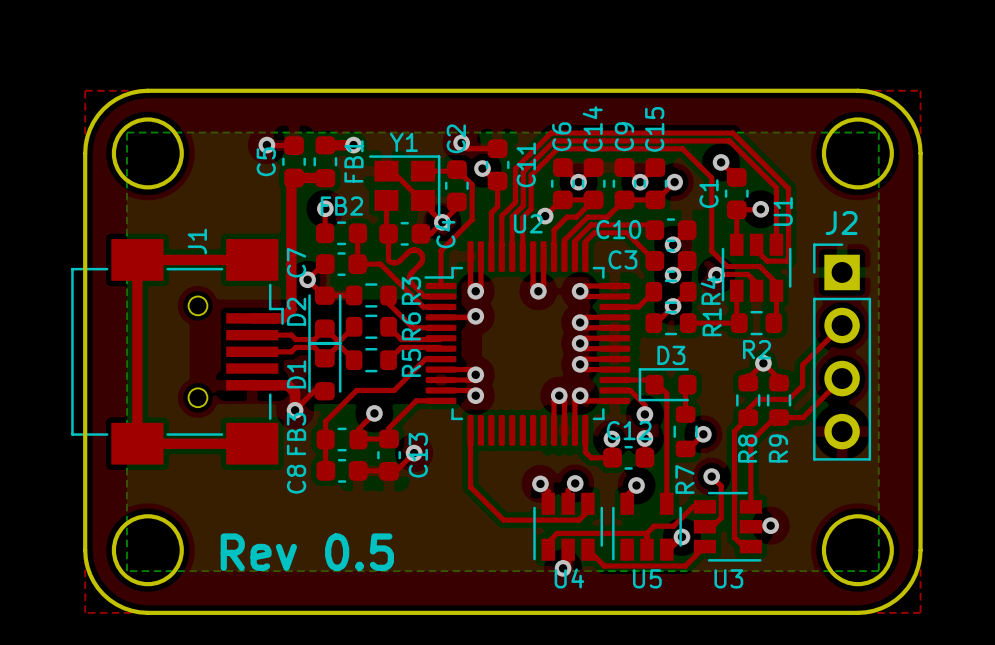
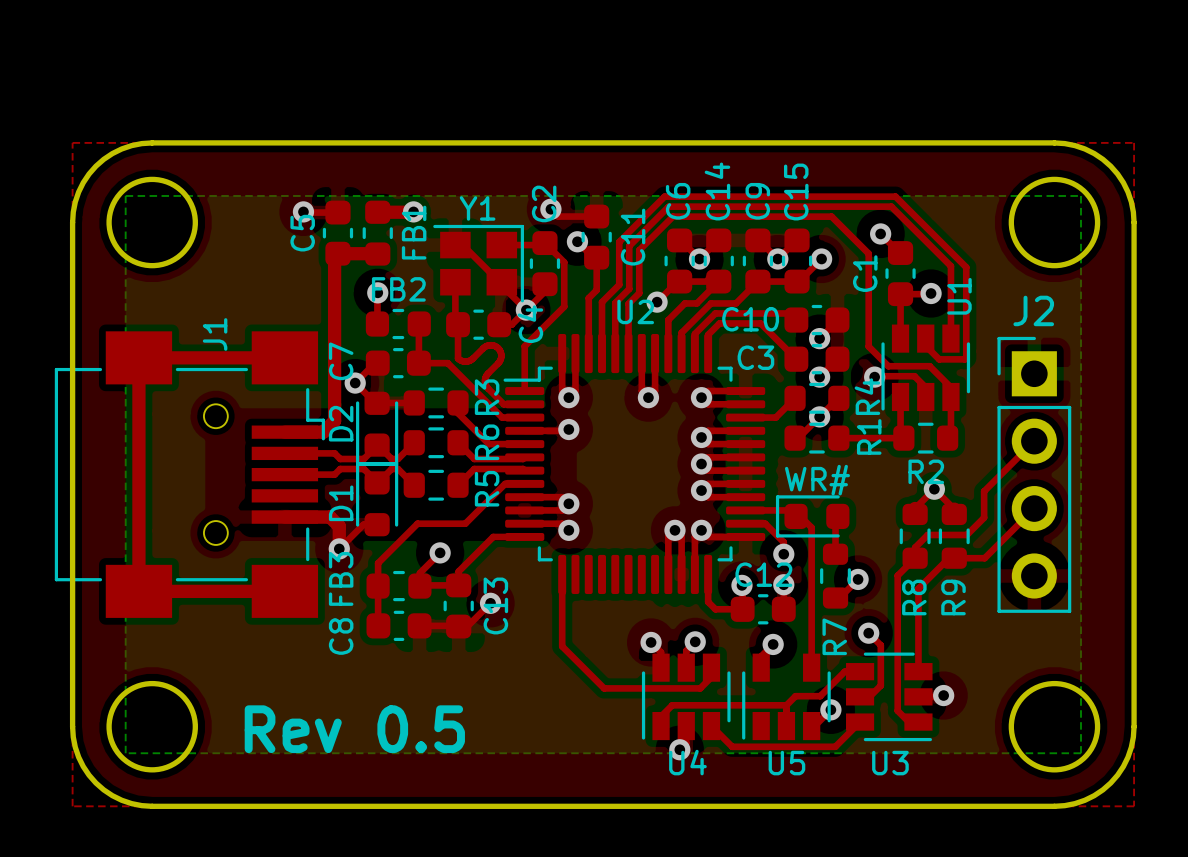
D3 name: D3 (671, 355) -> WR# (817, 480)

